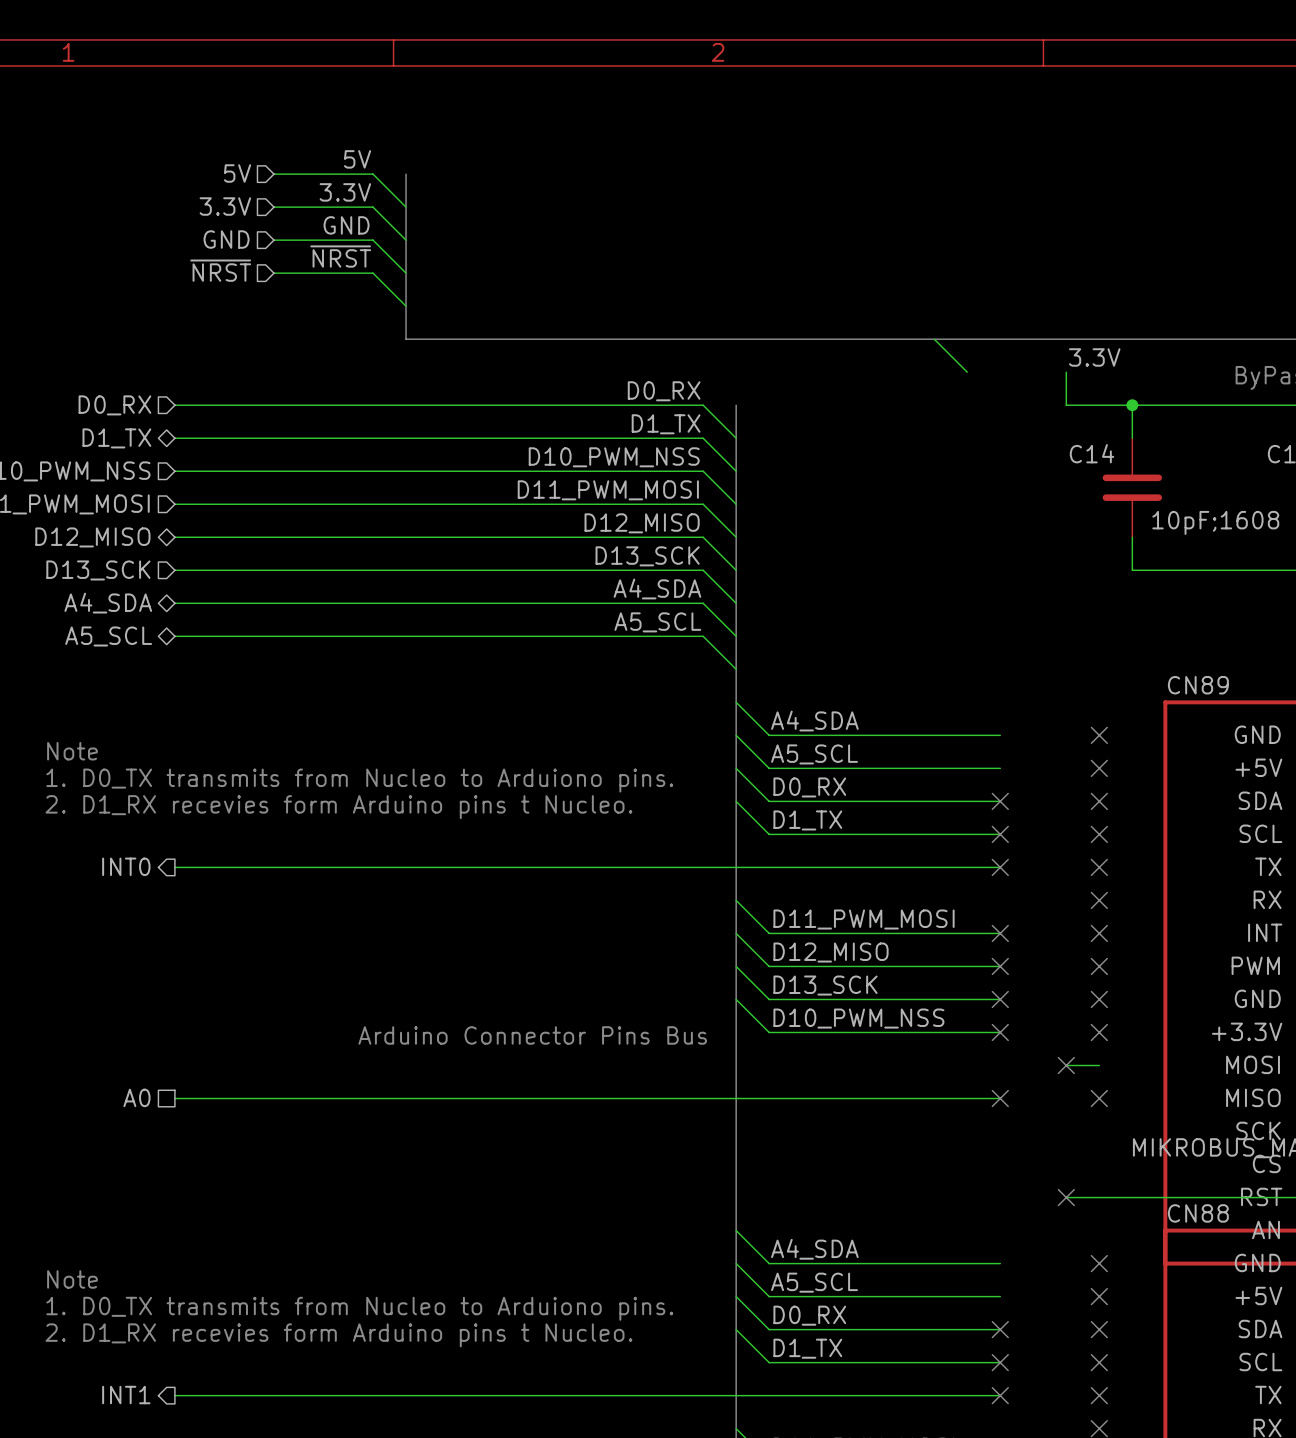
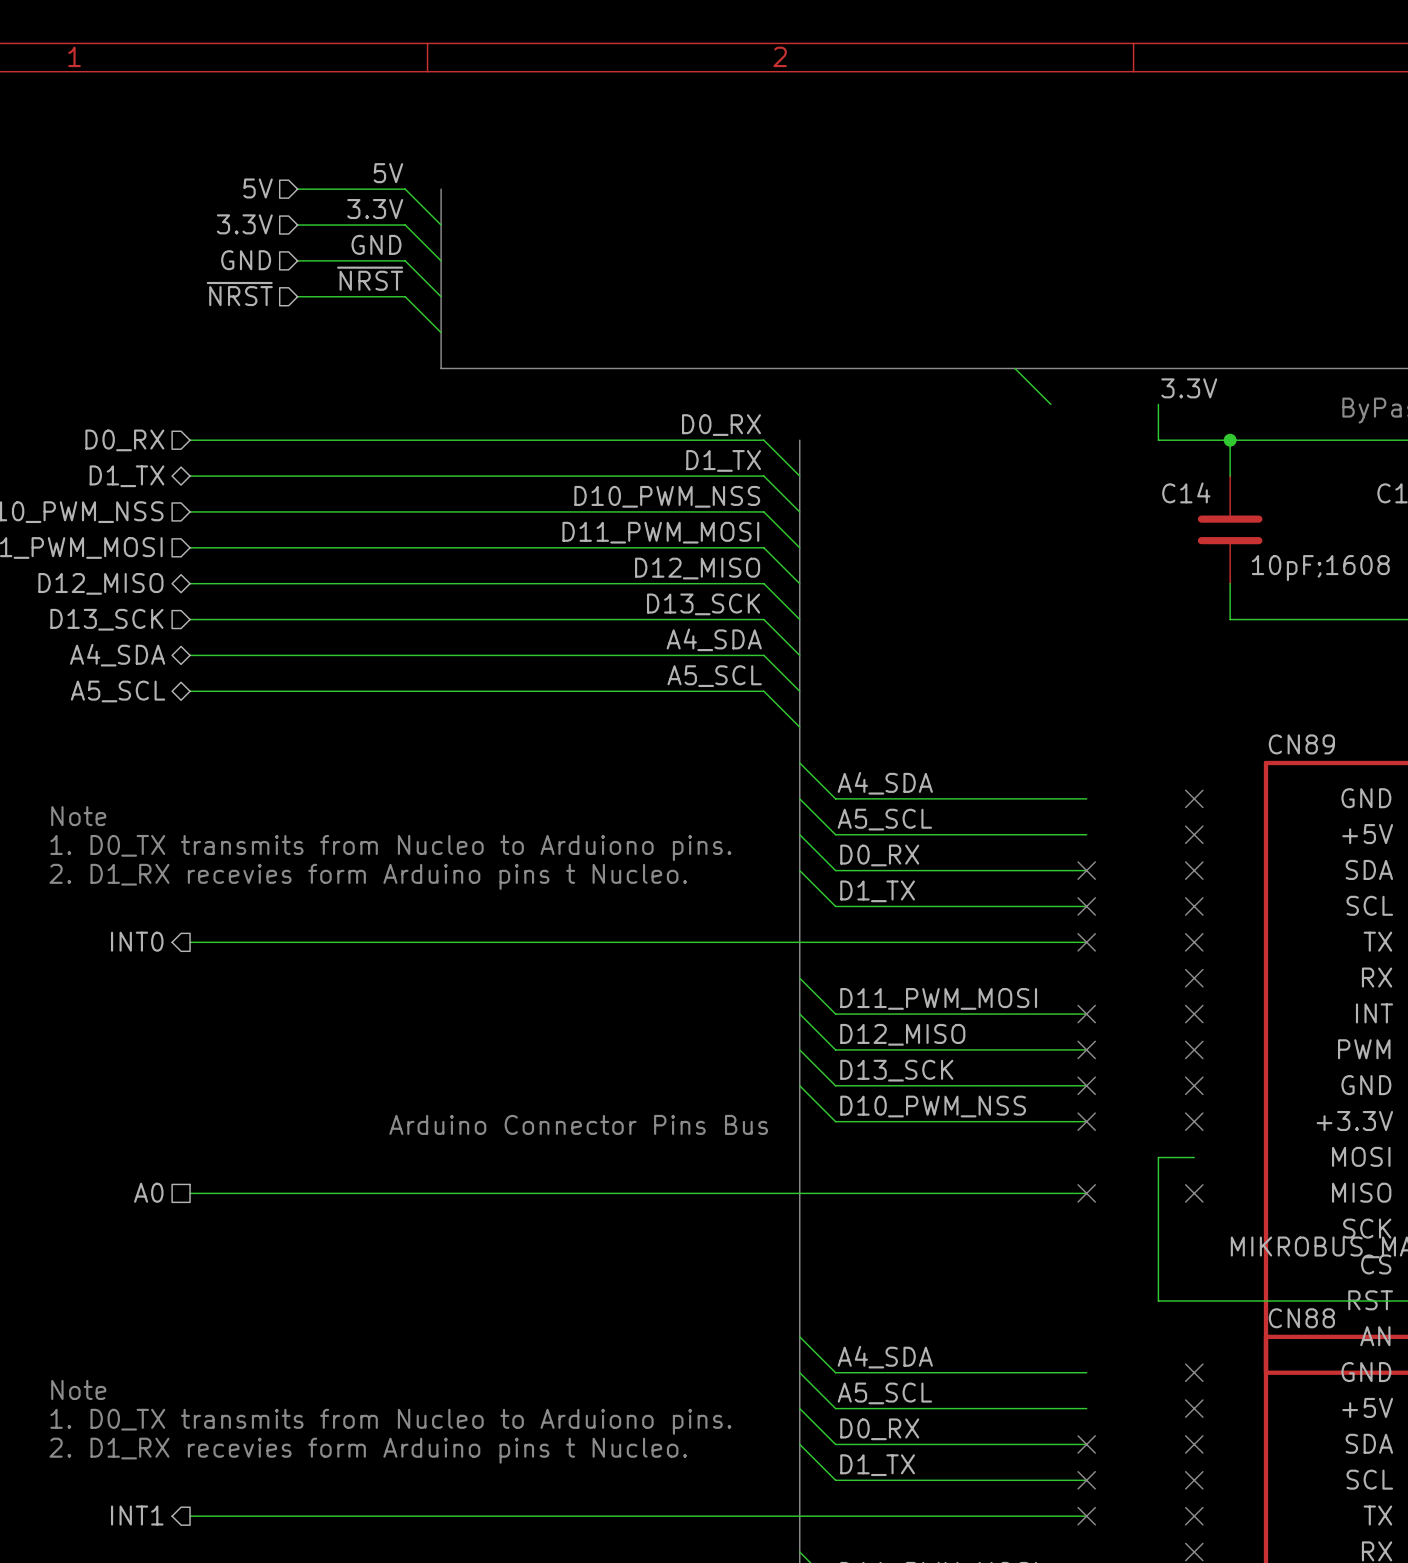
wire: none -> (1158, 1157) (1158, 1300)
no-connect mark: (1066, 1065) -> none
no-connect mark: (1066, 1197) -> none

